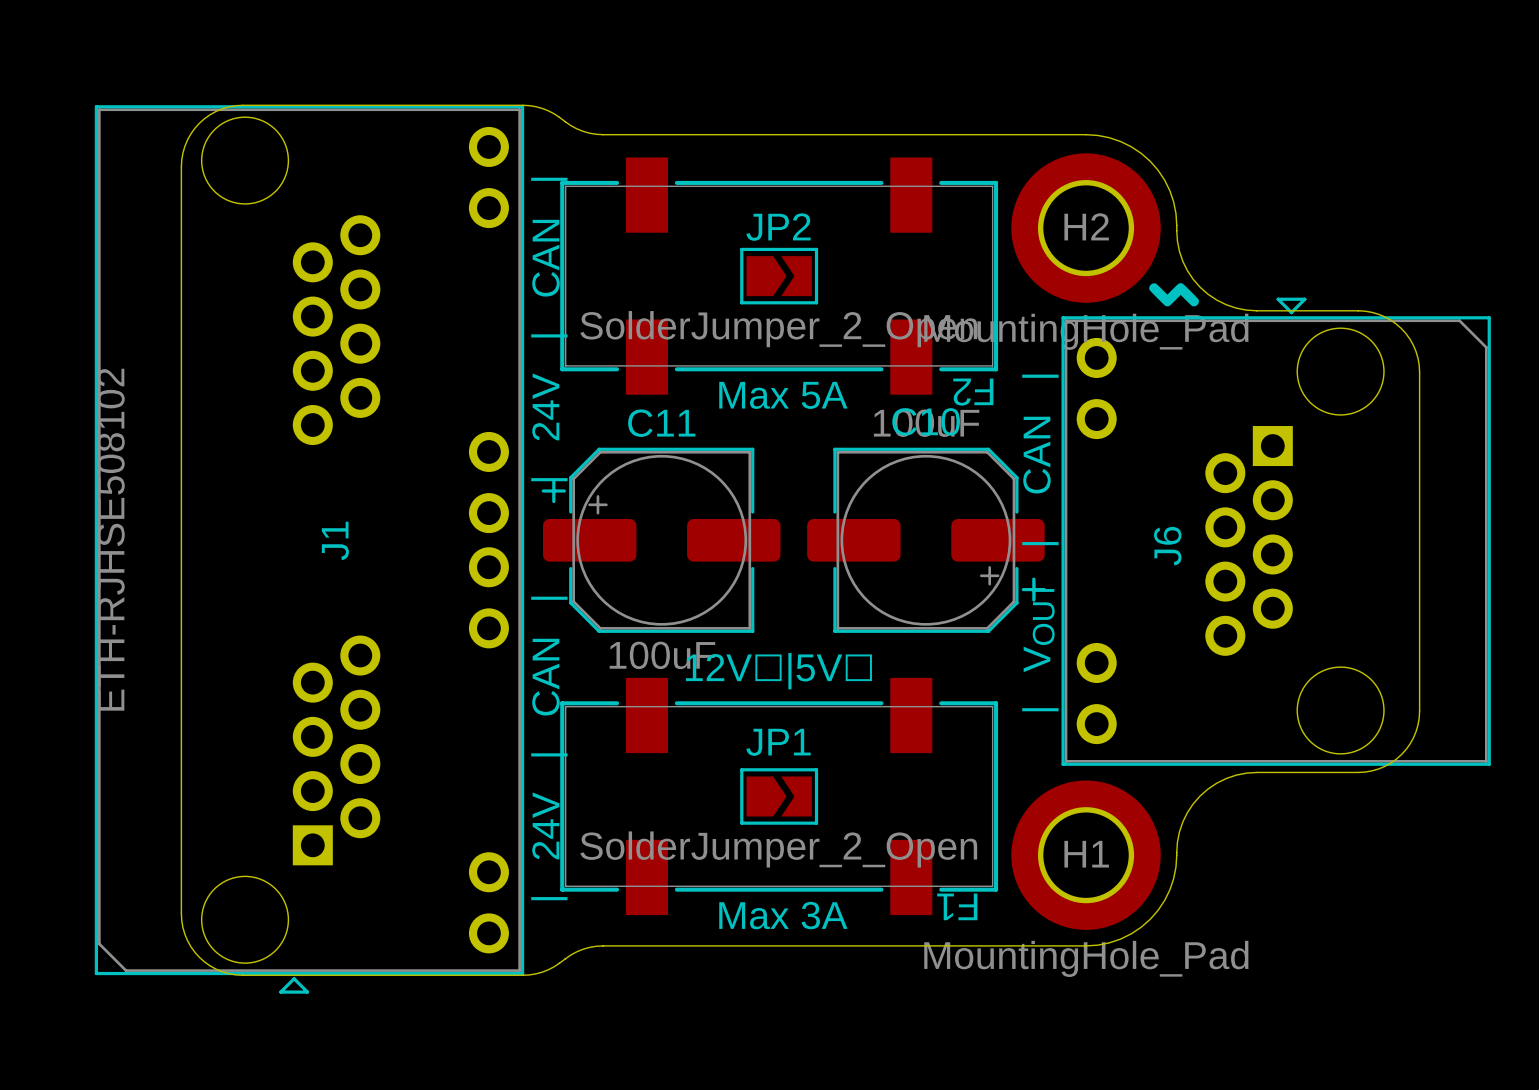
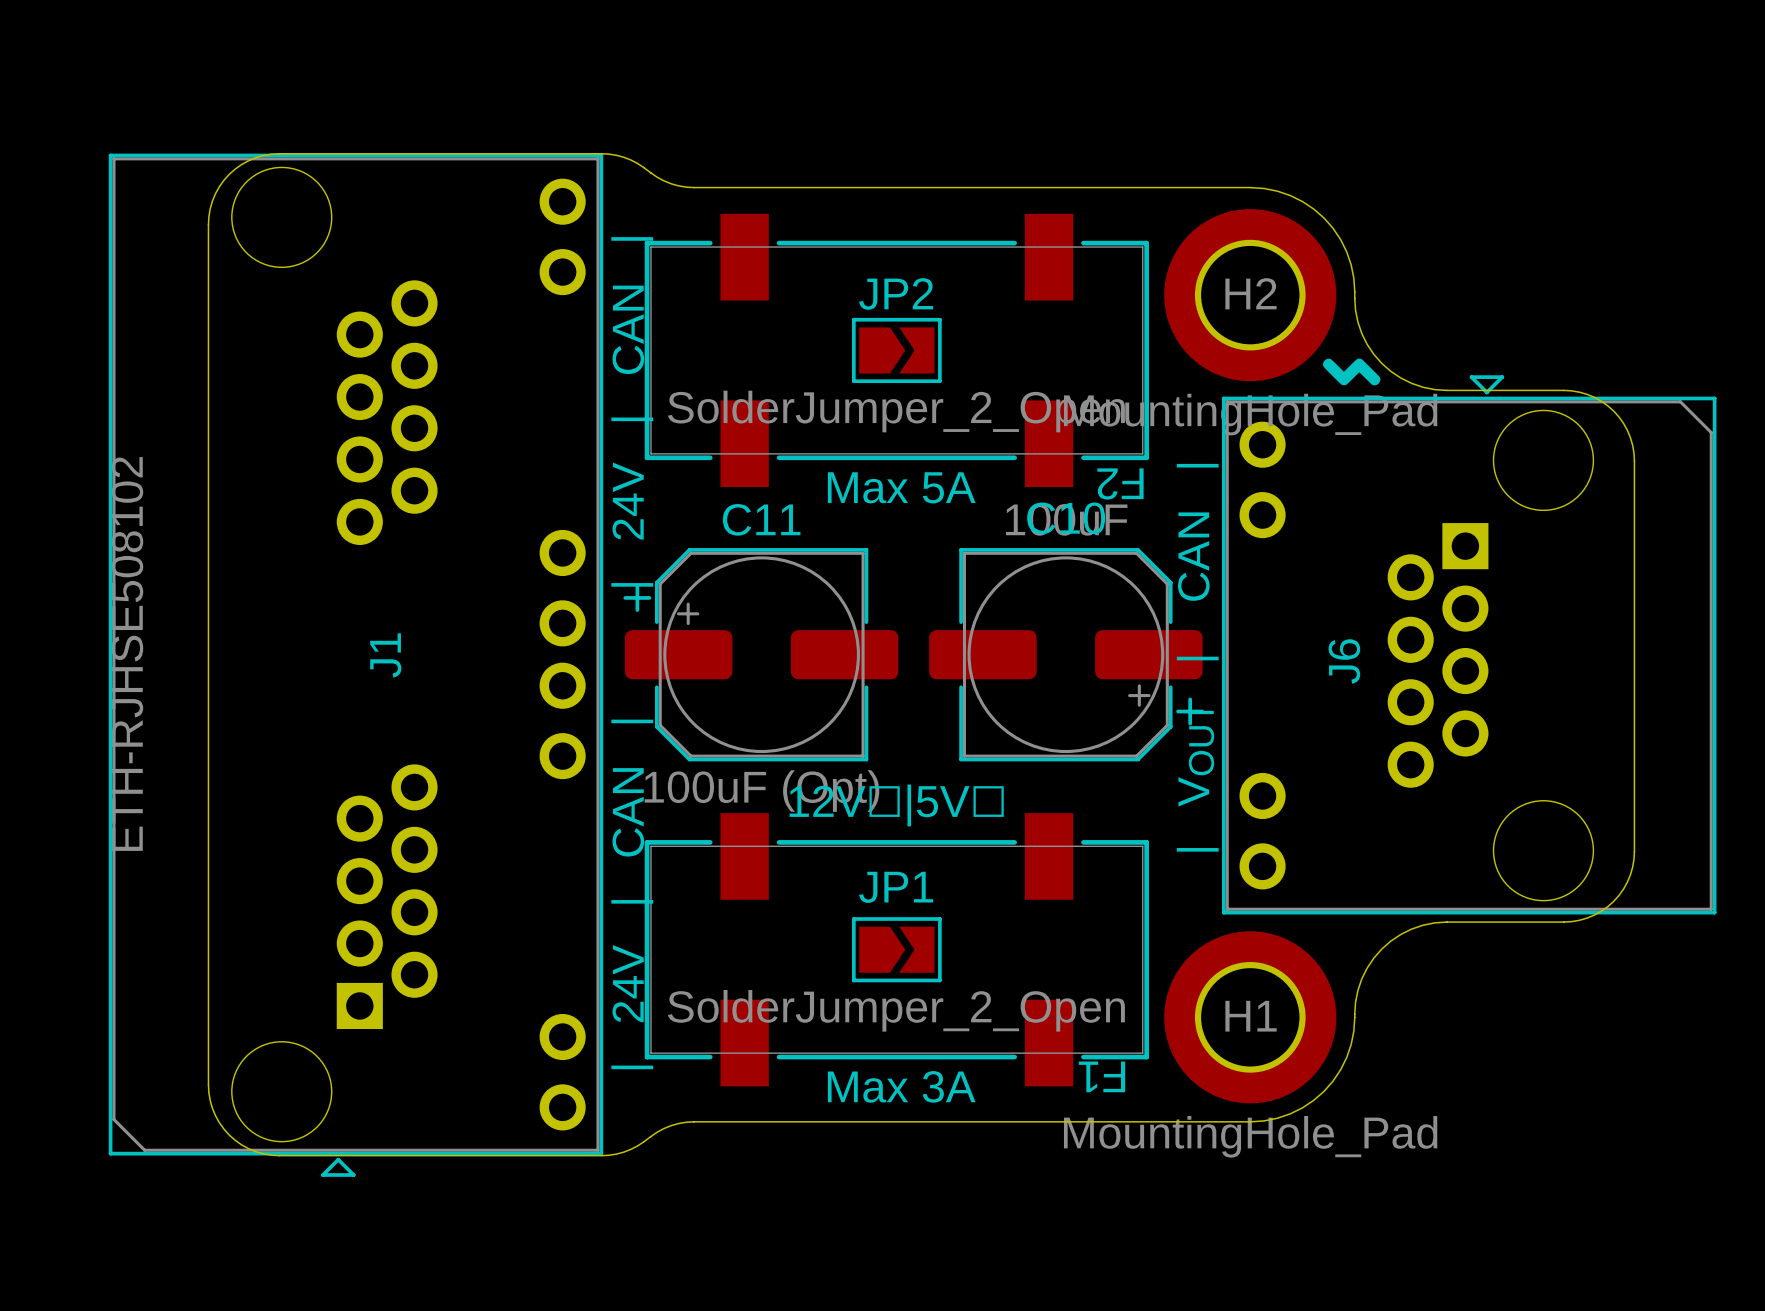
C11 value: 100uF (662, 655) -> 100uF (Opt) (761, 791)

